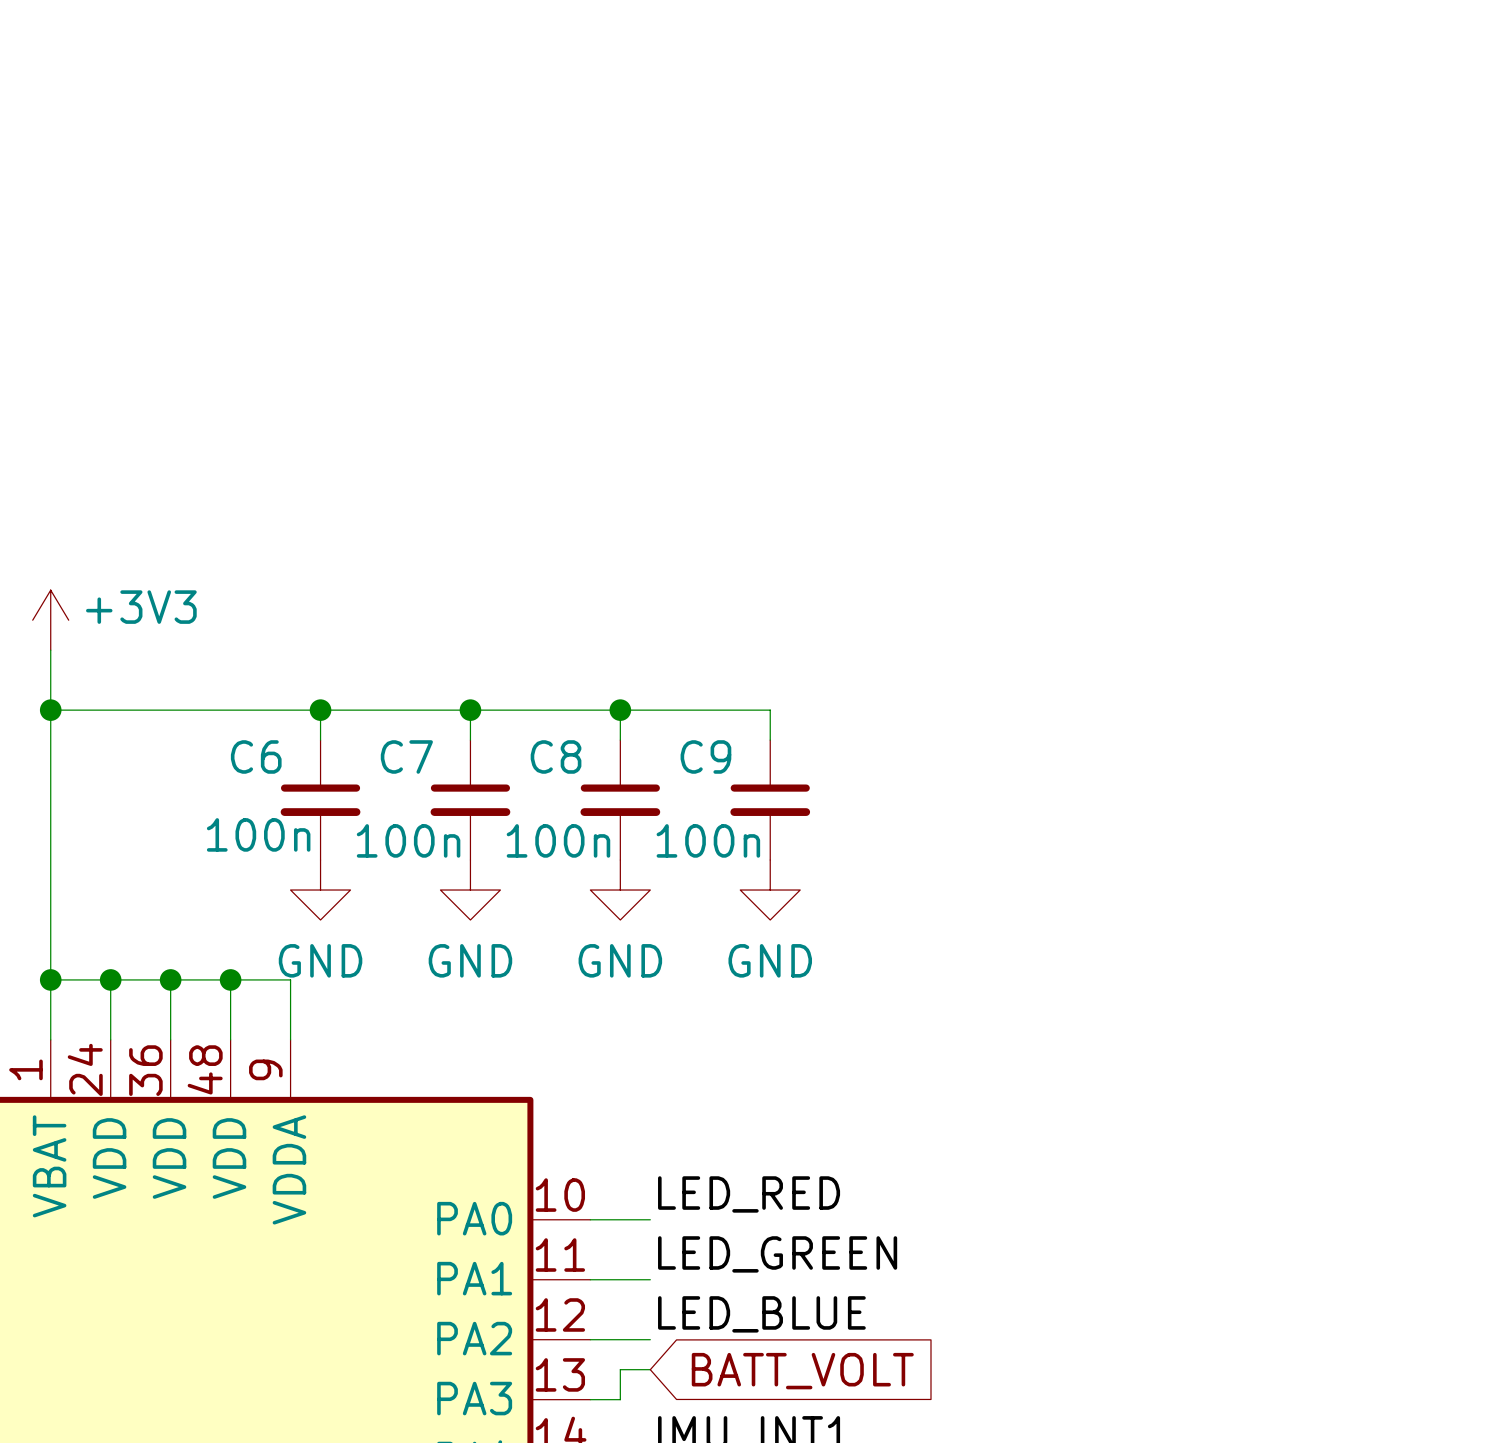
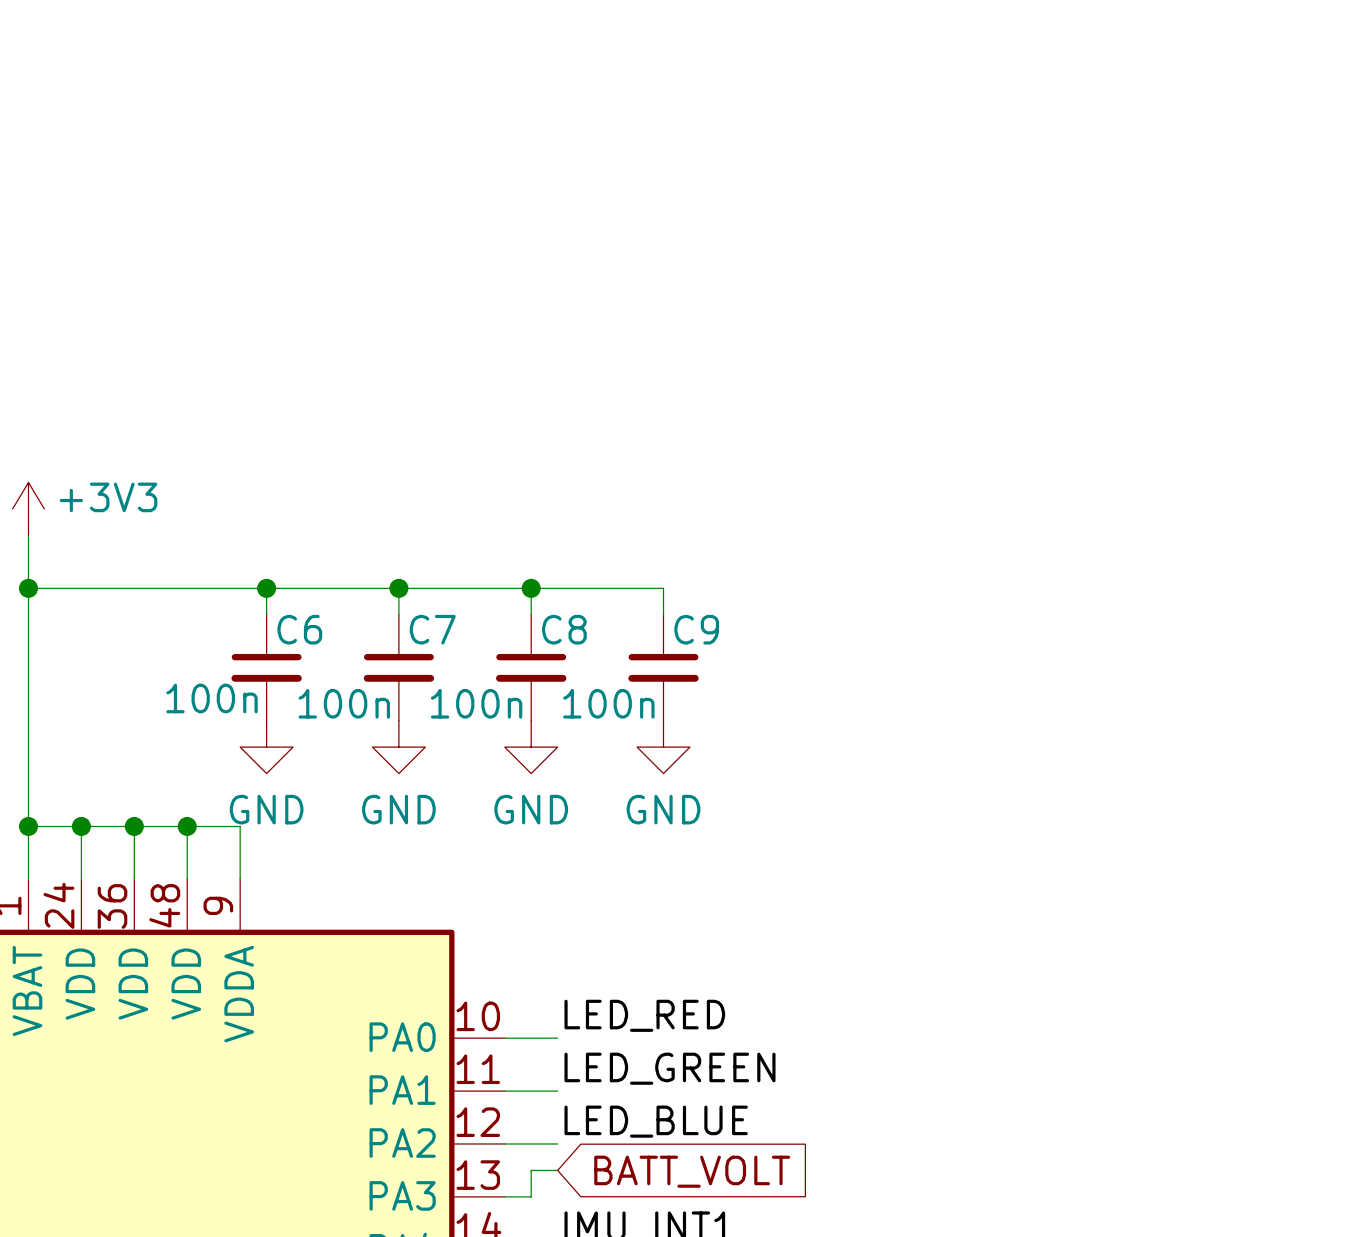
C6 name position: C6 (256, 756) -> C6 (299, 629)
C7 name position: C7 (406, 756) -> C7 (432, 629)
C8 name position: C8 (556, 756) -> C8 (564, 629)
C9 name position: C9 (705, 756) -> C9 (696, 629)

